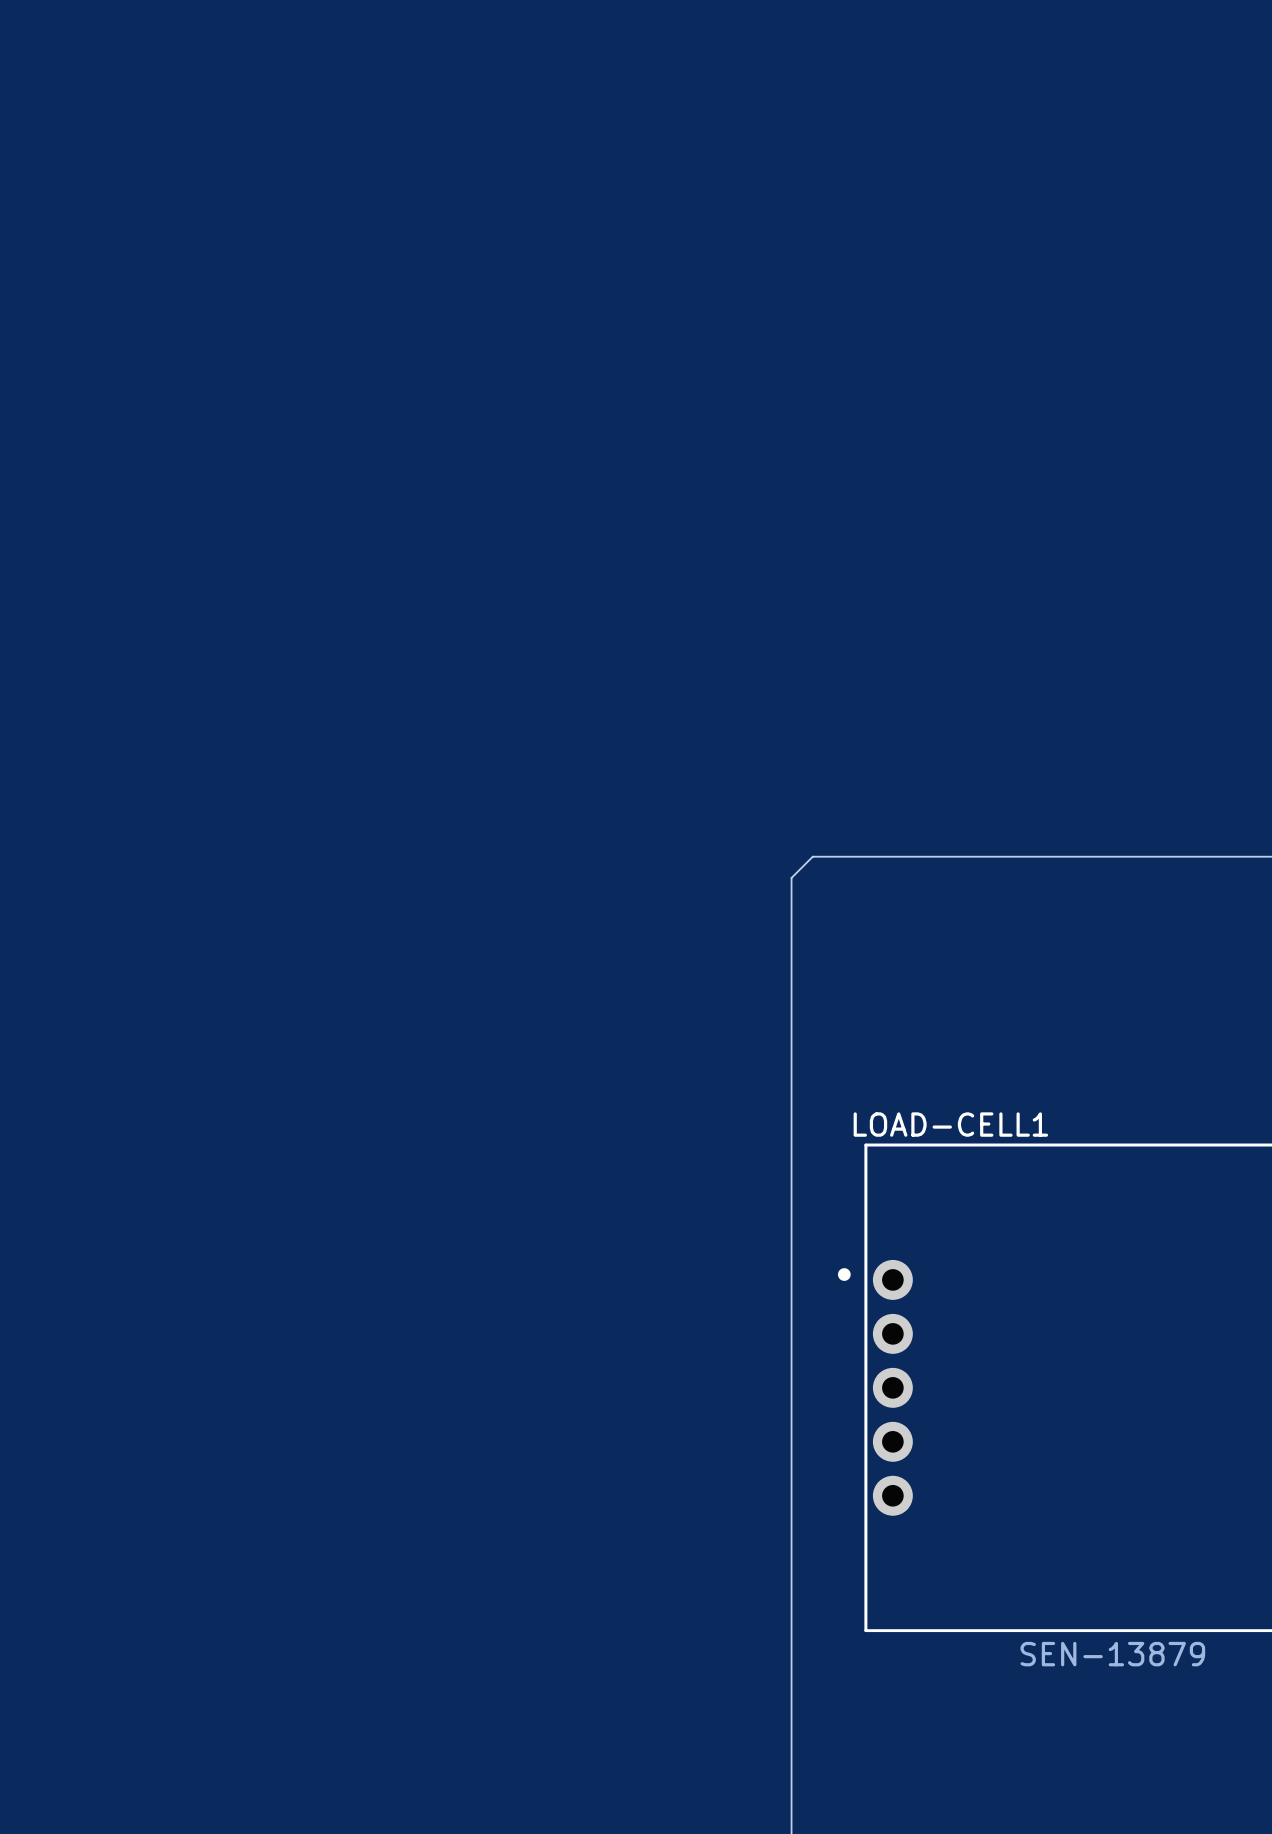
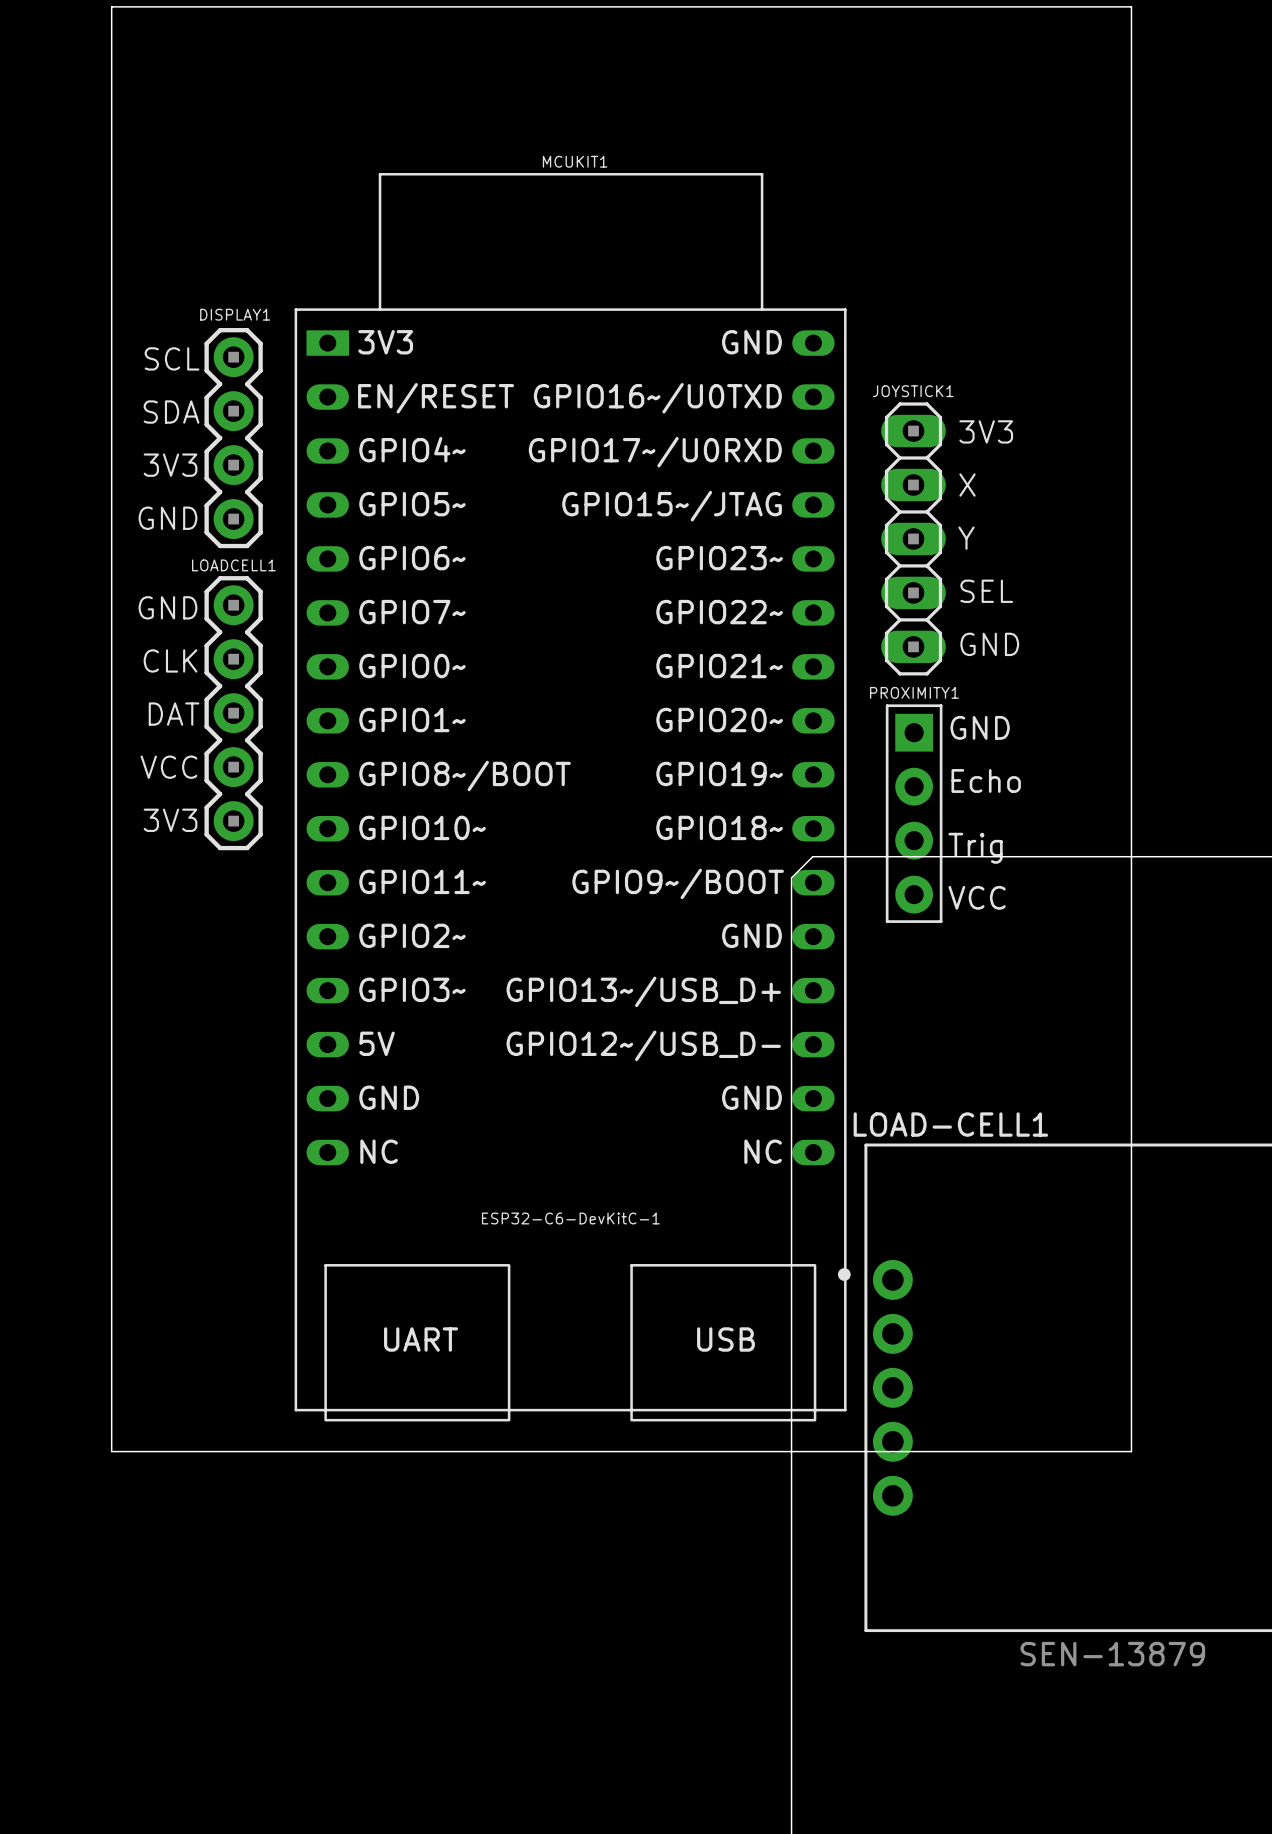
board edge: none -> (111, 6) (1131, 6) (1131, 1451) (111, 1451) (111, 6)
DISPLAY1: none -> (233, 438)
JOYSTICK1: none -> (913, 538)
LOADCELL1: none -> (233, 713)
MCUKIT1: none -> ESP32-C6-DevKitC-1 (570, 797)
PROXIMITY1: none -> (914, 813)

